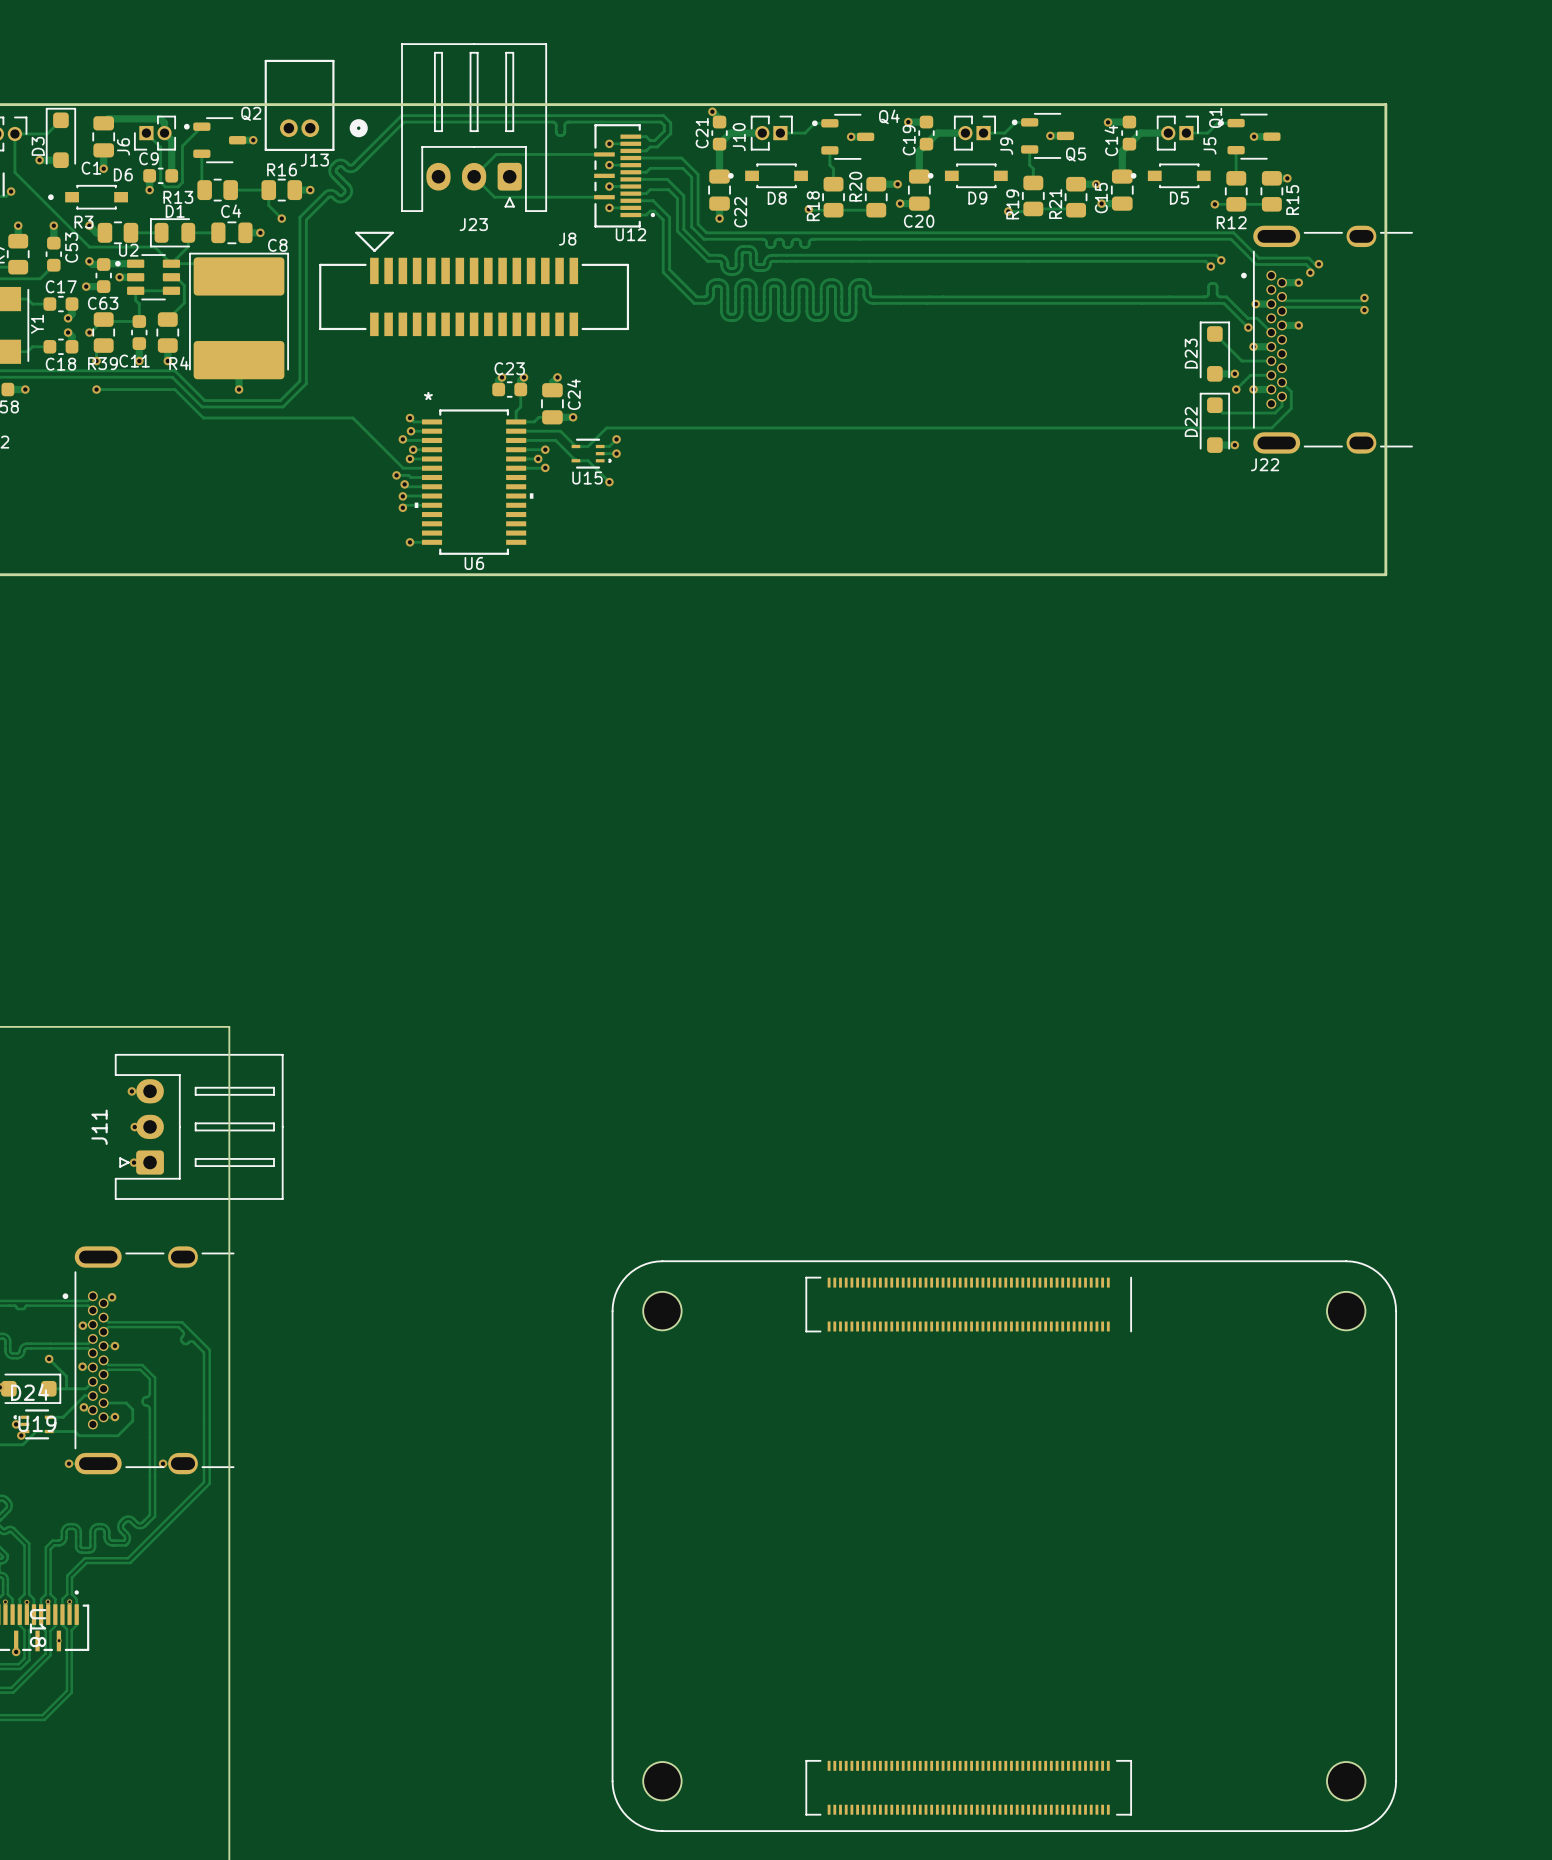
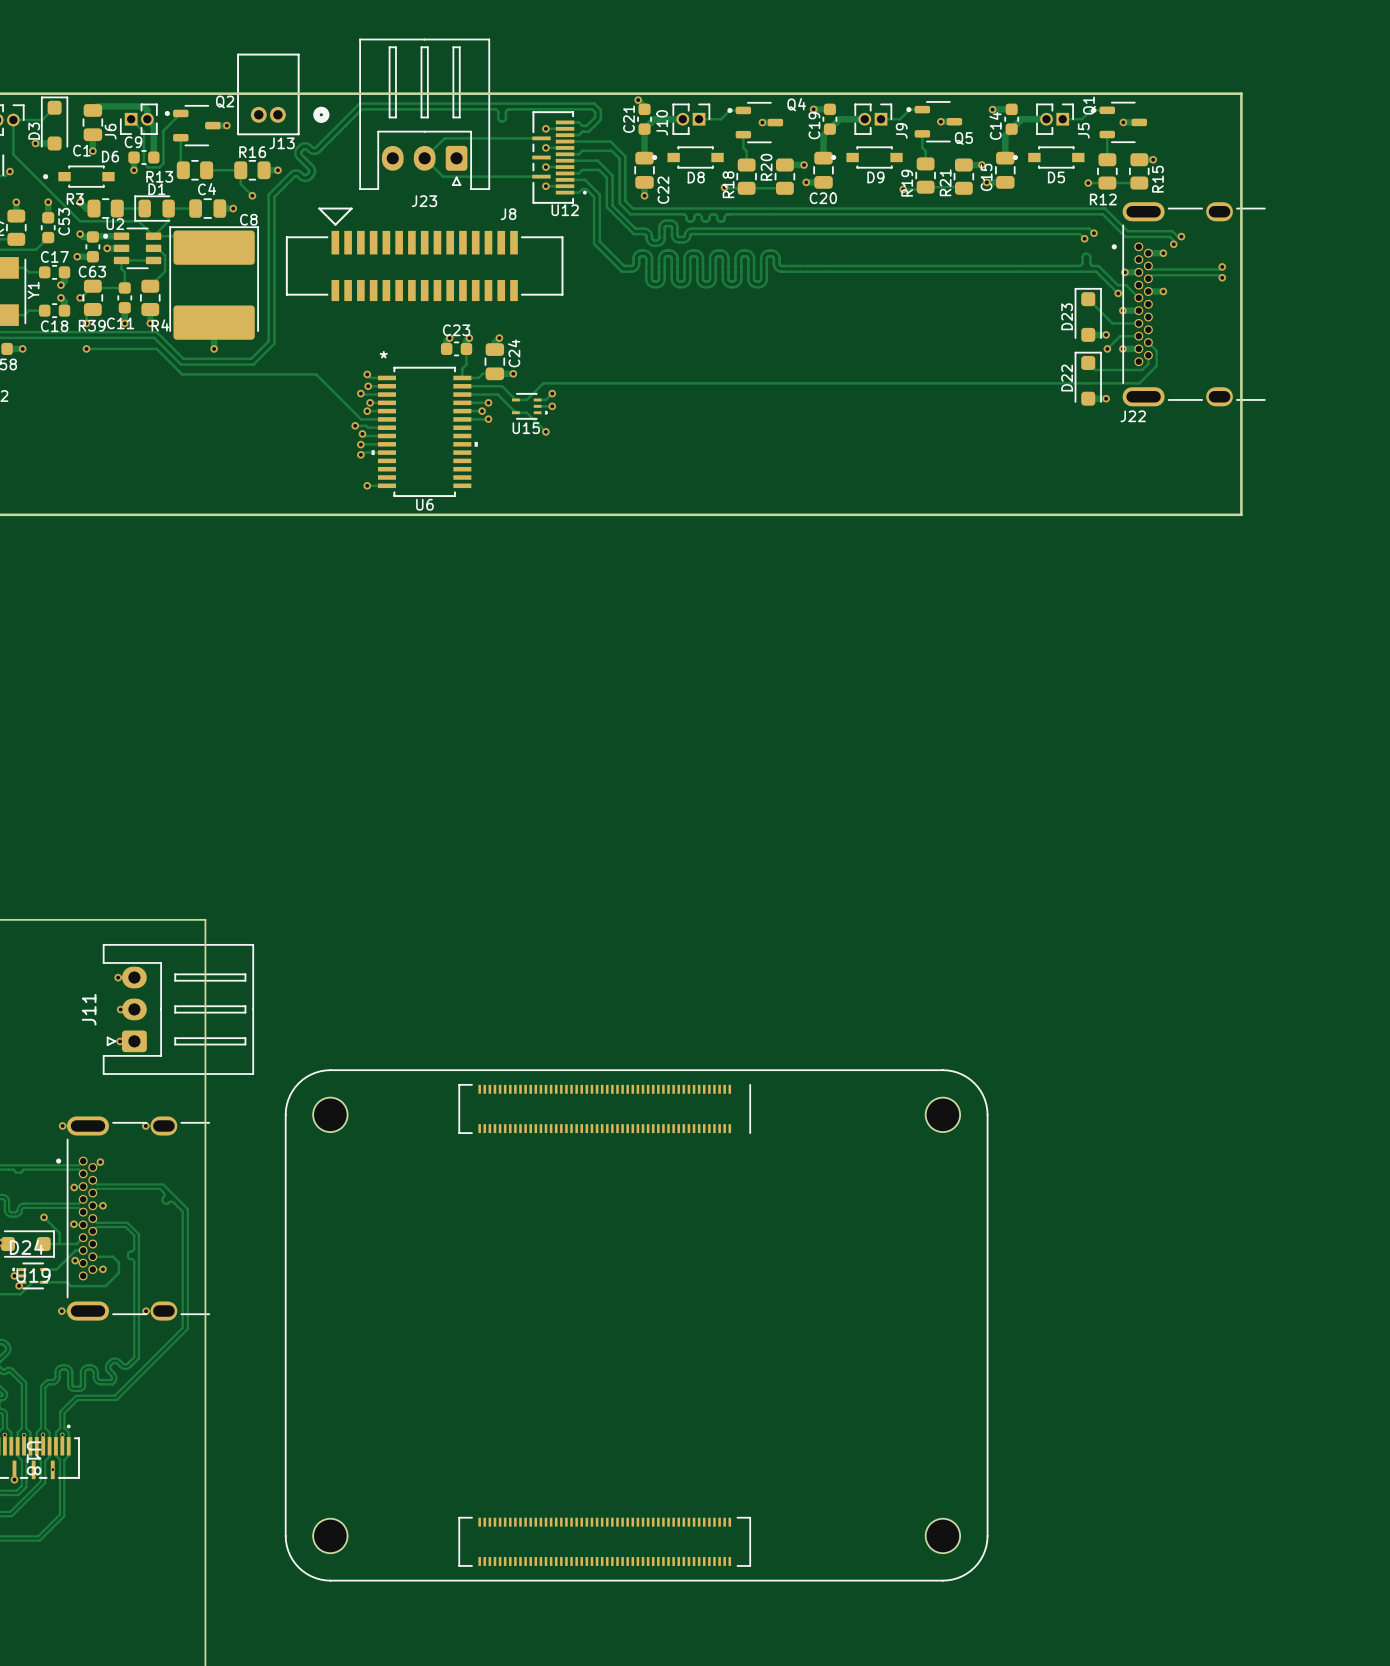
via: none -> (62, 1125)
via: none -> (145, 1125)
part position: (1004, 1546) -> (636, 1325)

